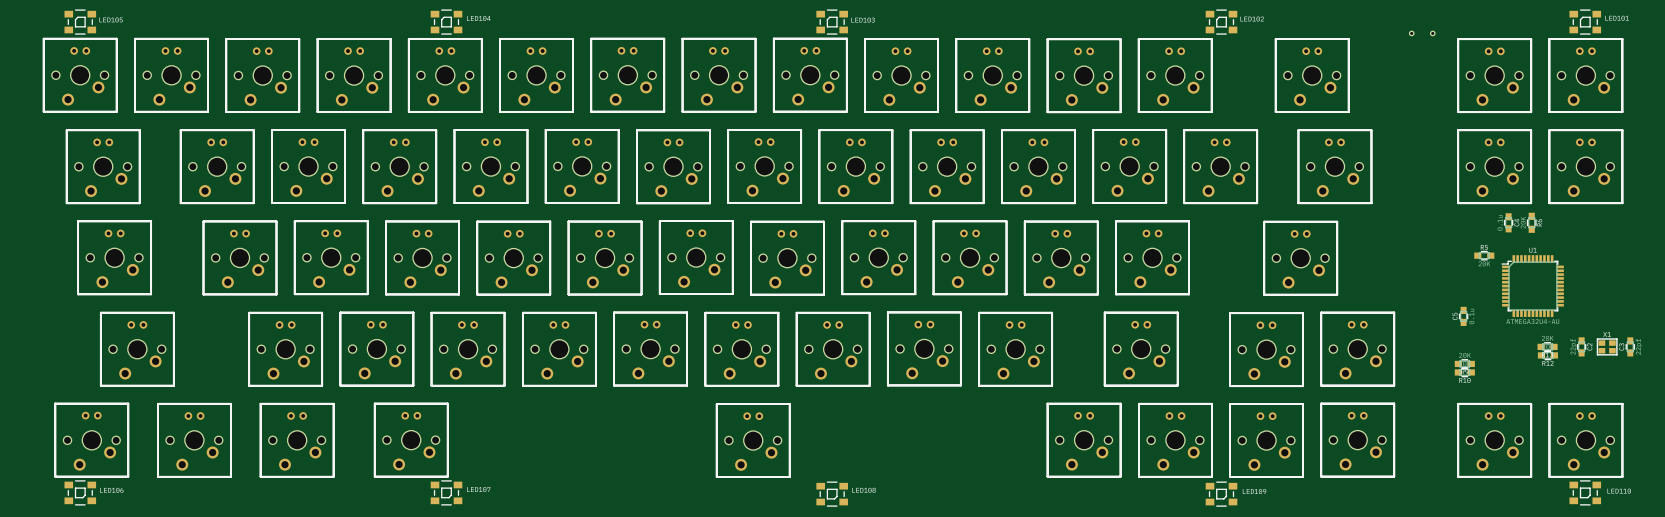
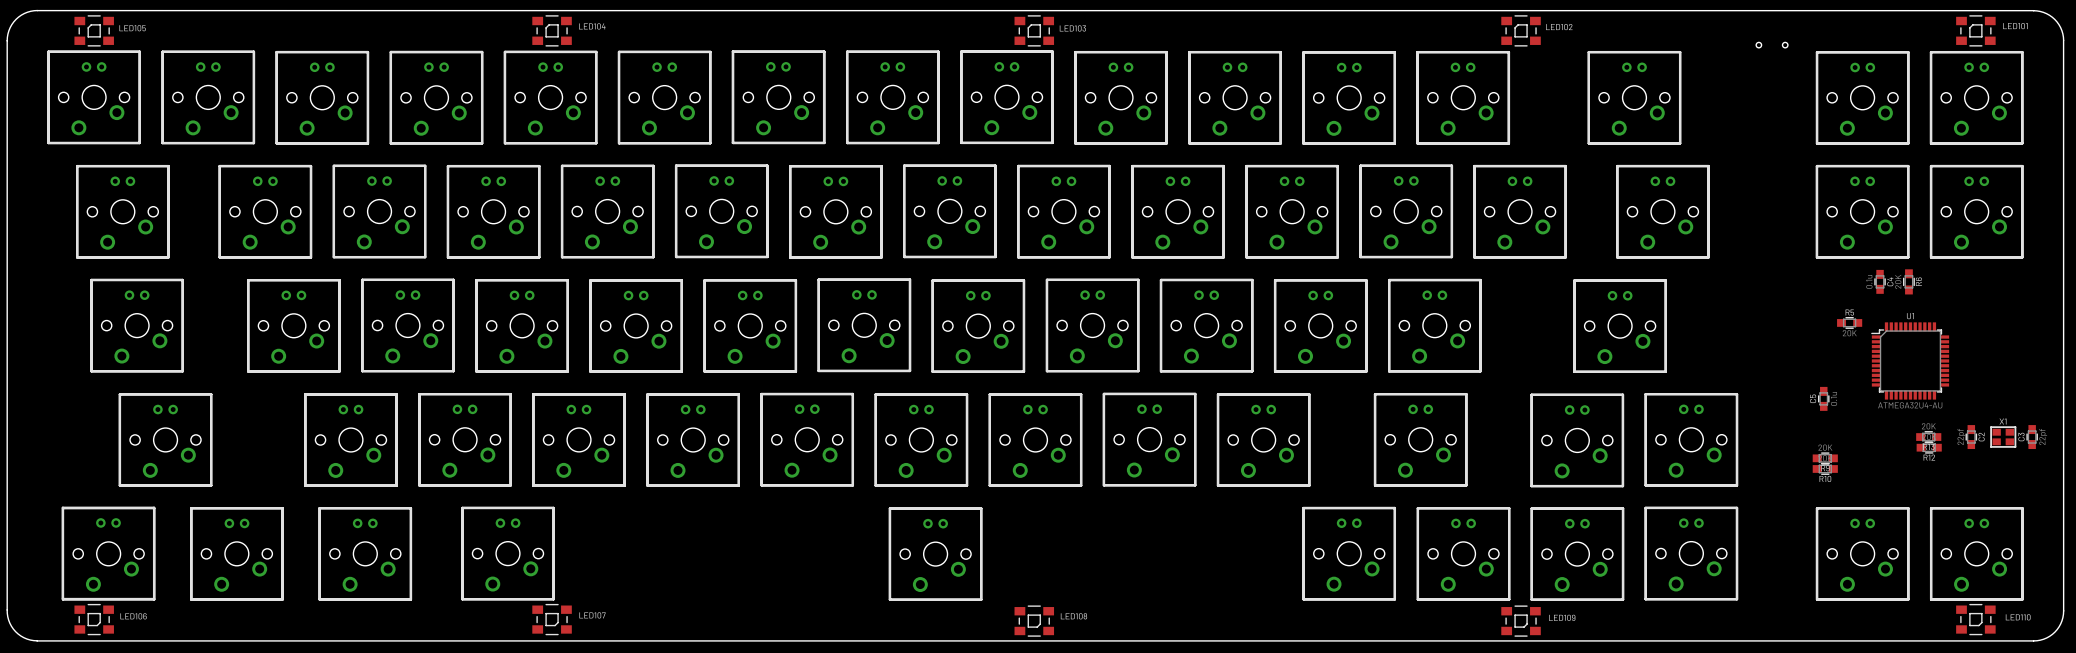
board edge: none -> (37, 10) (27, 12) (16, 19) (8, 30) (7, 40)
board edge: none -> (37, 10) (2033, 10)
board edge: none -> (2033, 10) (2046, 13) (2054, 19) (2060, 27) (2063, 40)
board edge: none -> (7, 40) (7, 609)
board edge: none -> (2063, 40) (2063, 610)
board edge: none -> (7, 609) (9, 623) (15, 631) (27, 639) (37, 640)
board edge: none -> (2063, 610) (2062, 620) (2054, 632) (2043, 639) (2033, 640)
board edge: none -> (37, 640) (2033, 640)

